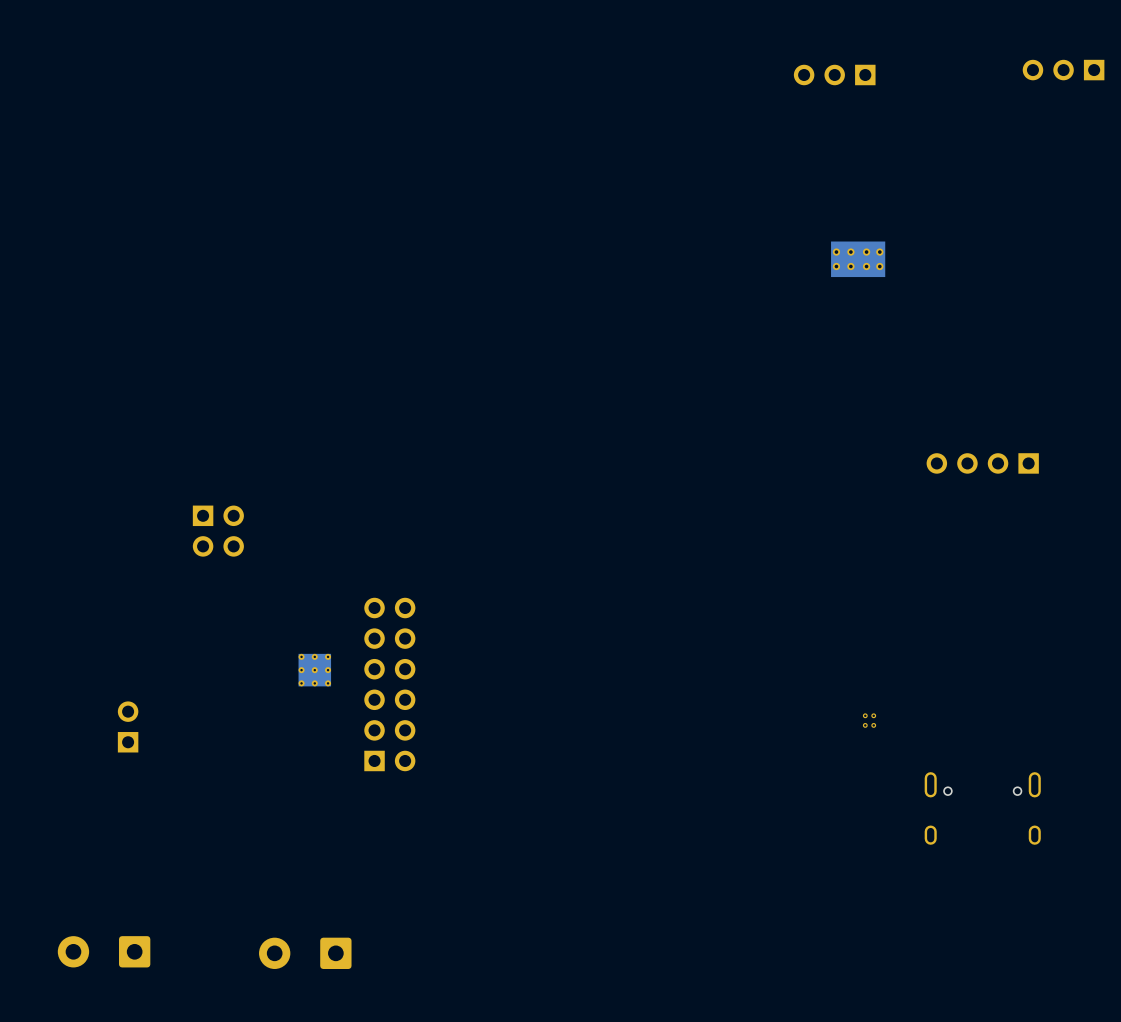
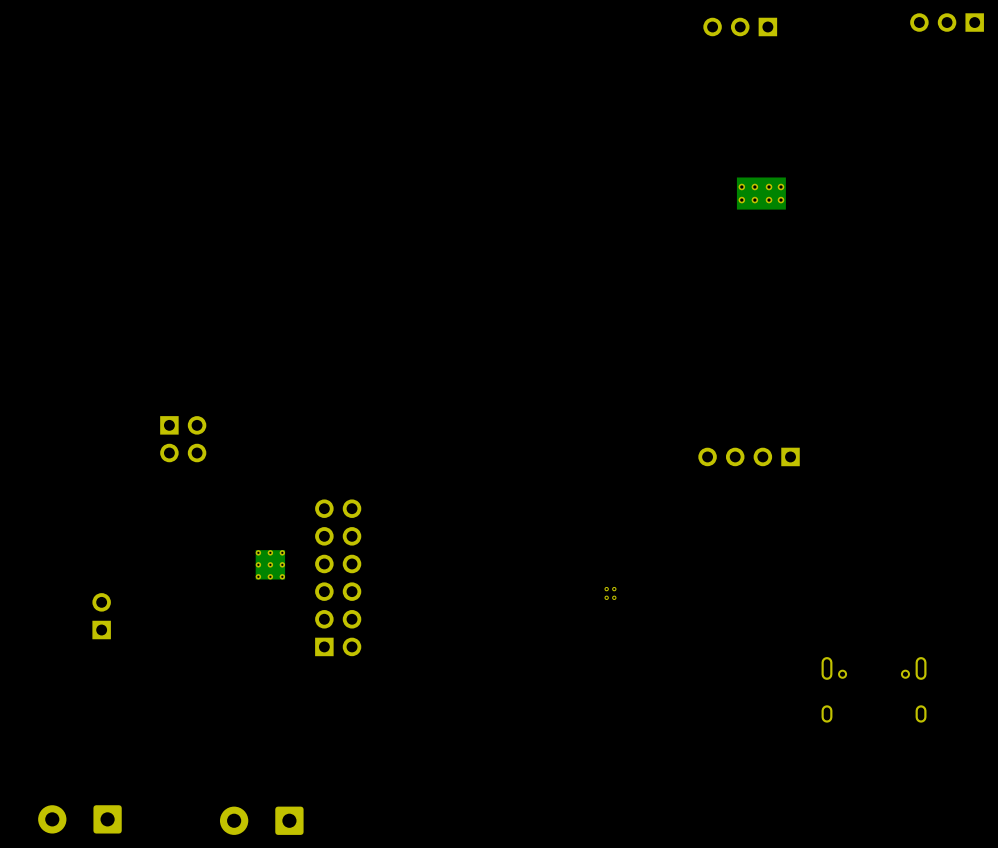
part position: (982, 463) -> (749, 456)
part position: (869, 720) -> (610, 593)

